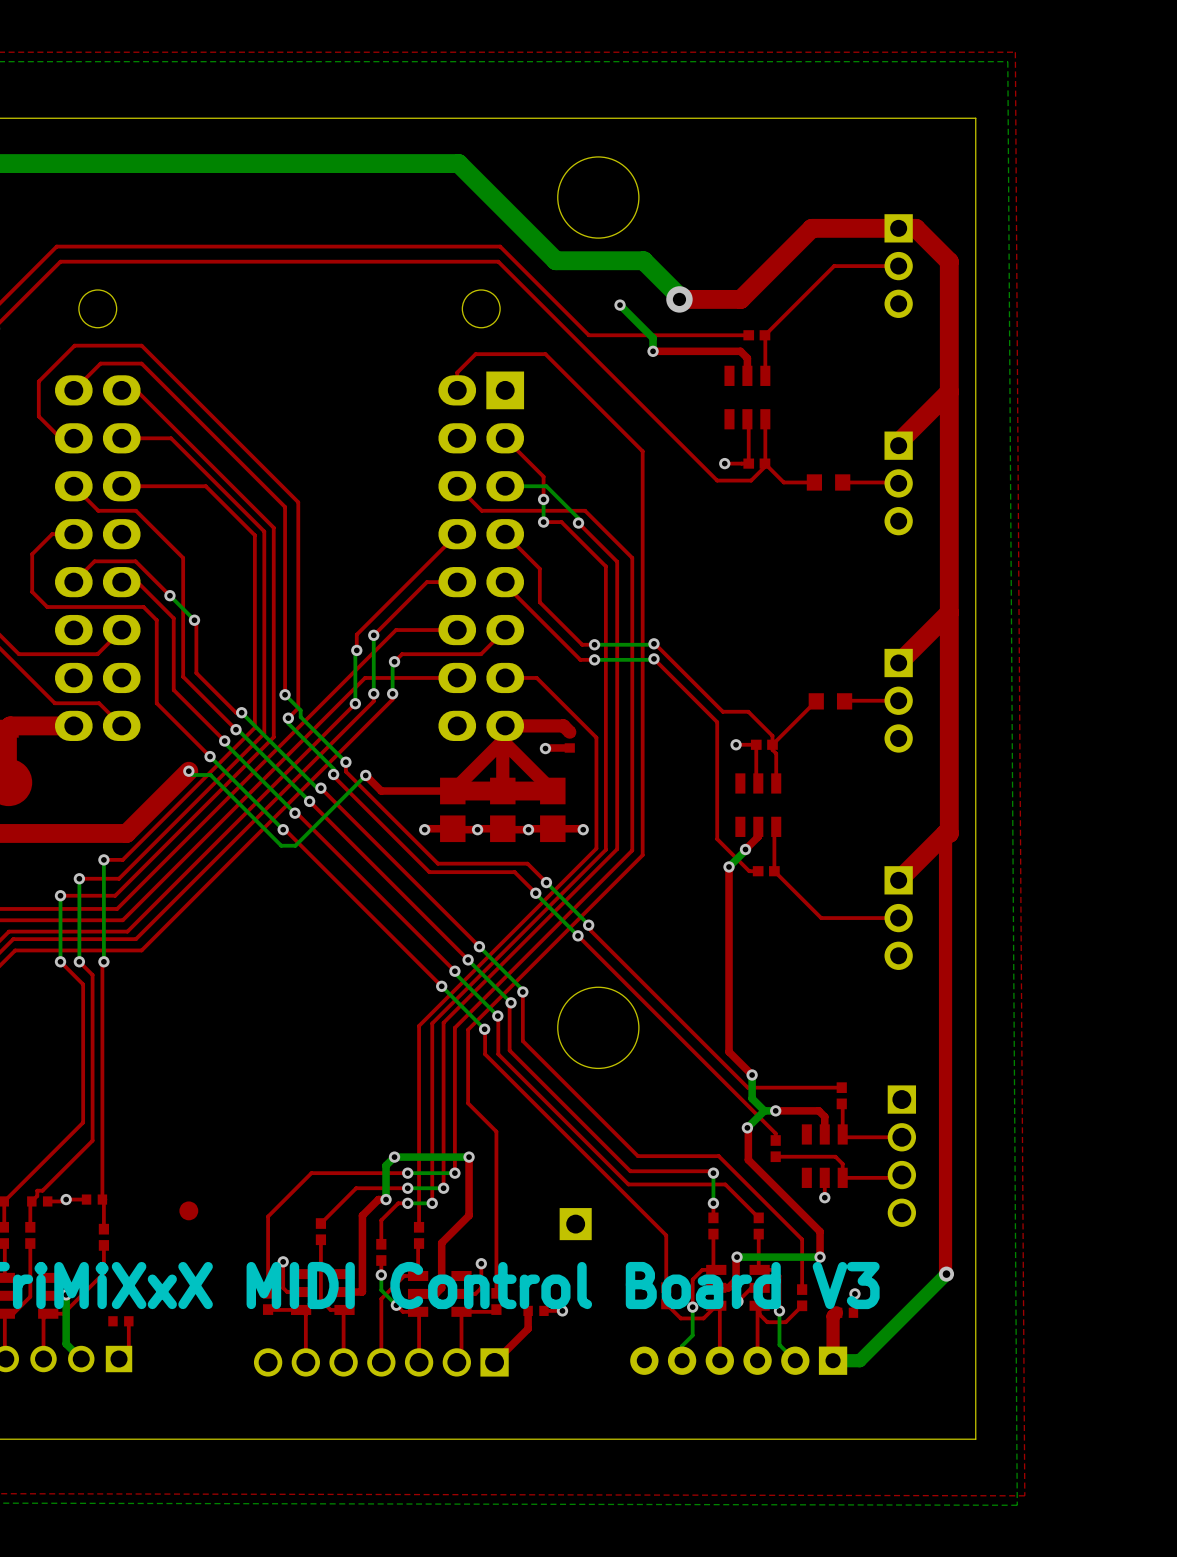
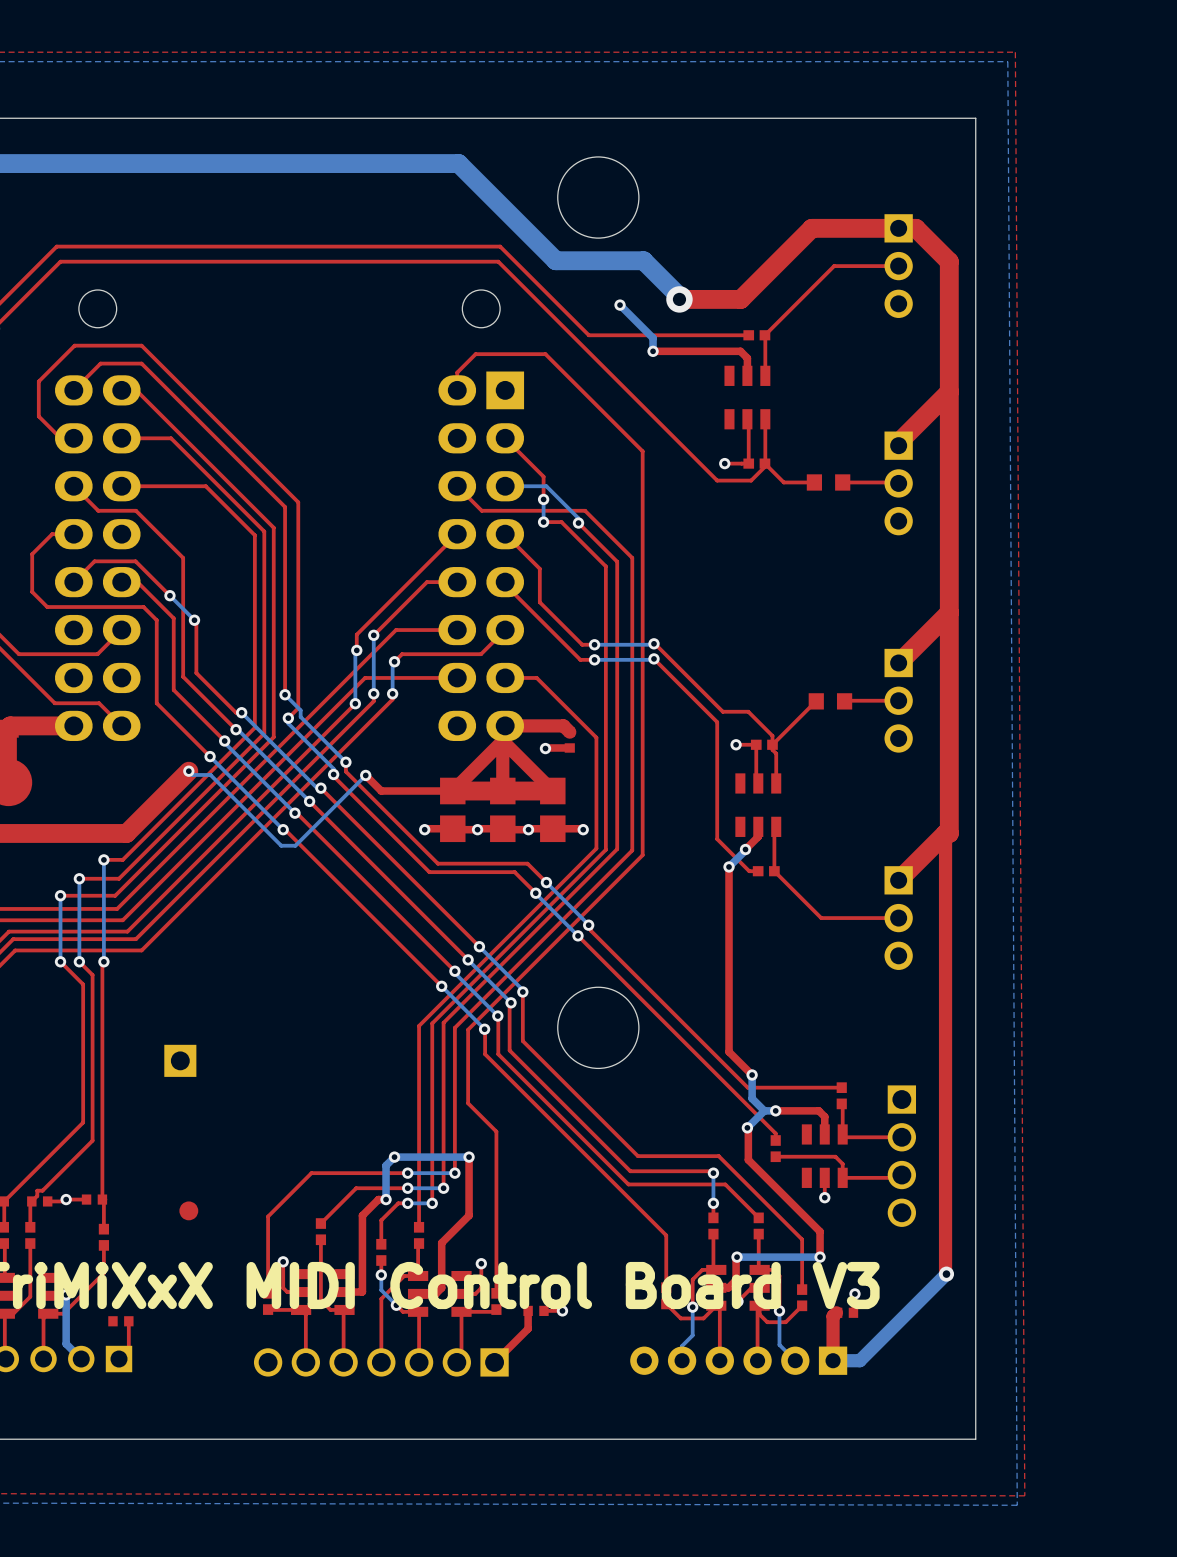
part position: (575, 1224) -> (180, 1060)

